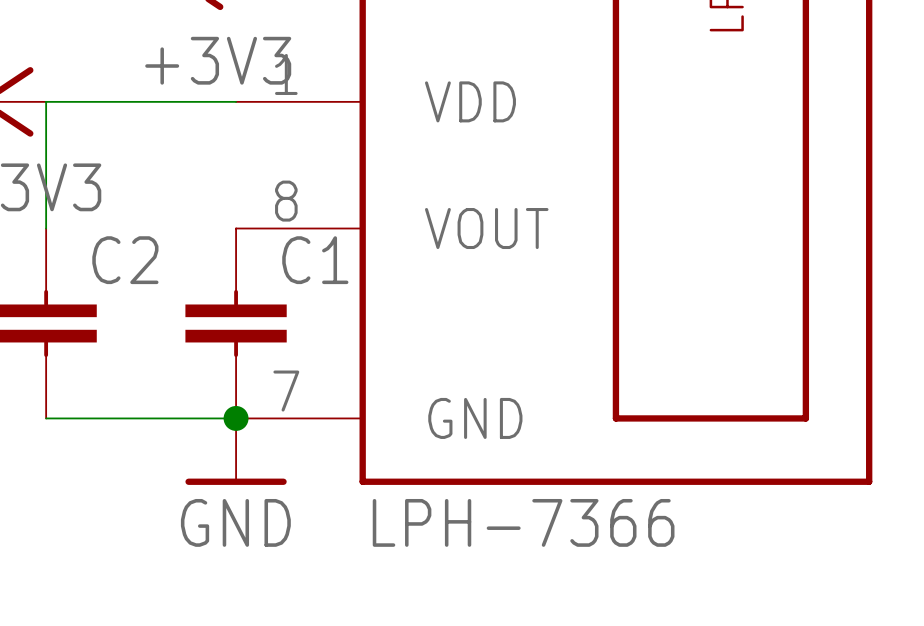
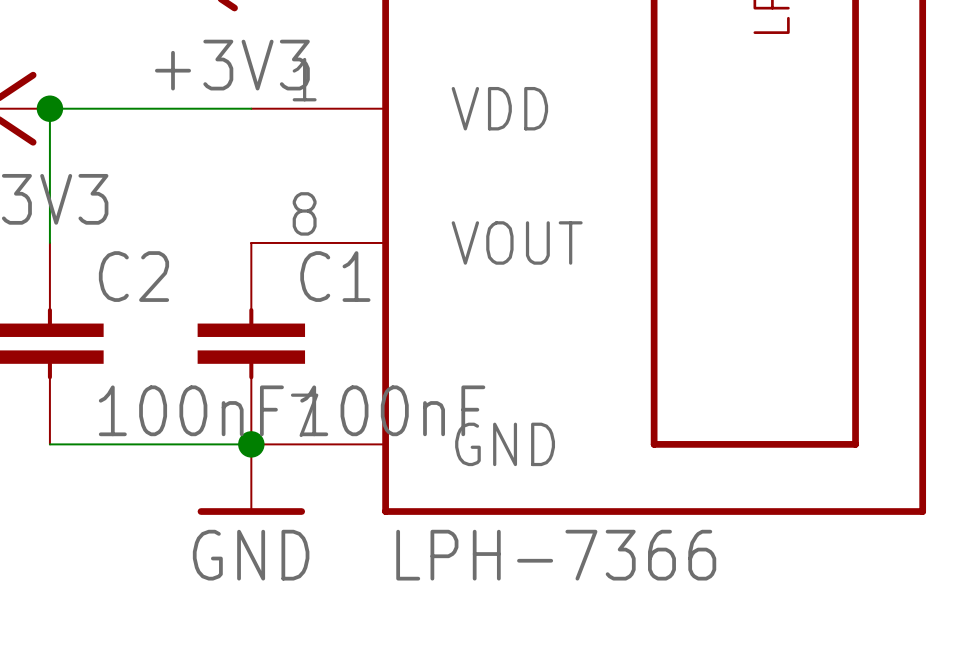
junction: none -> (49, 108)
C2 value: none -> 100nF (191, 410)
C1 value: none -> 100nF (392, 410)

